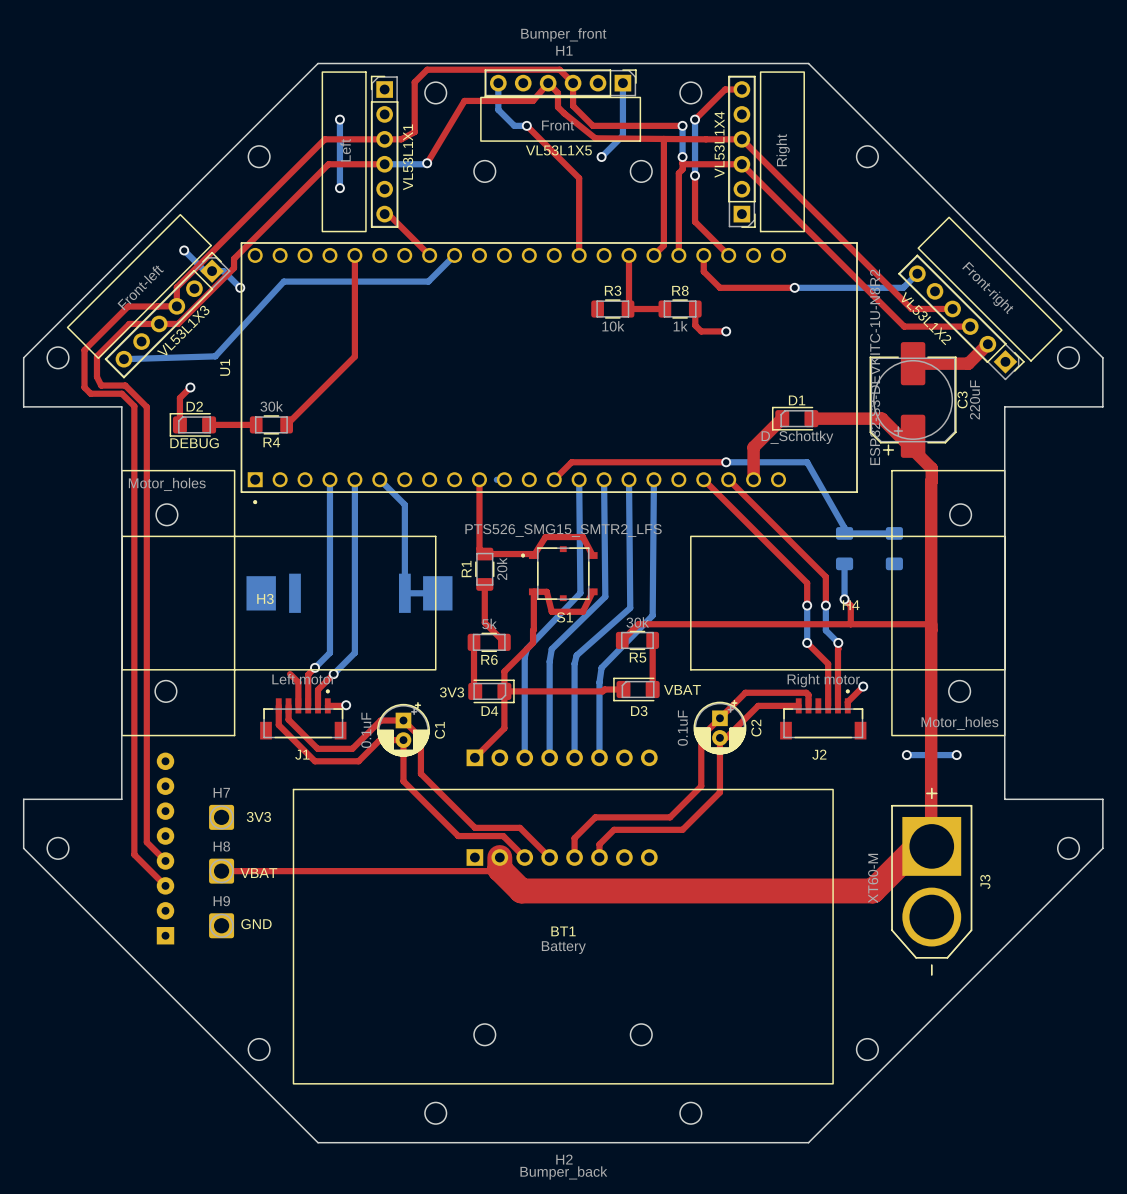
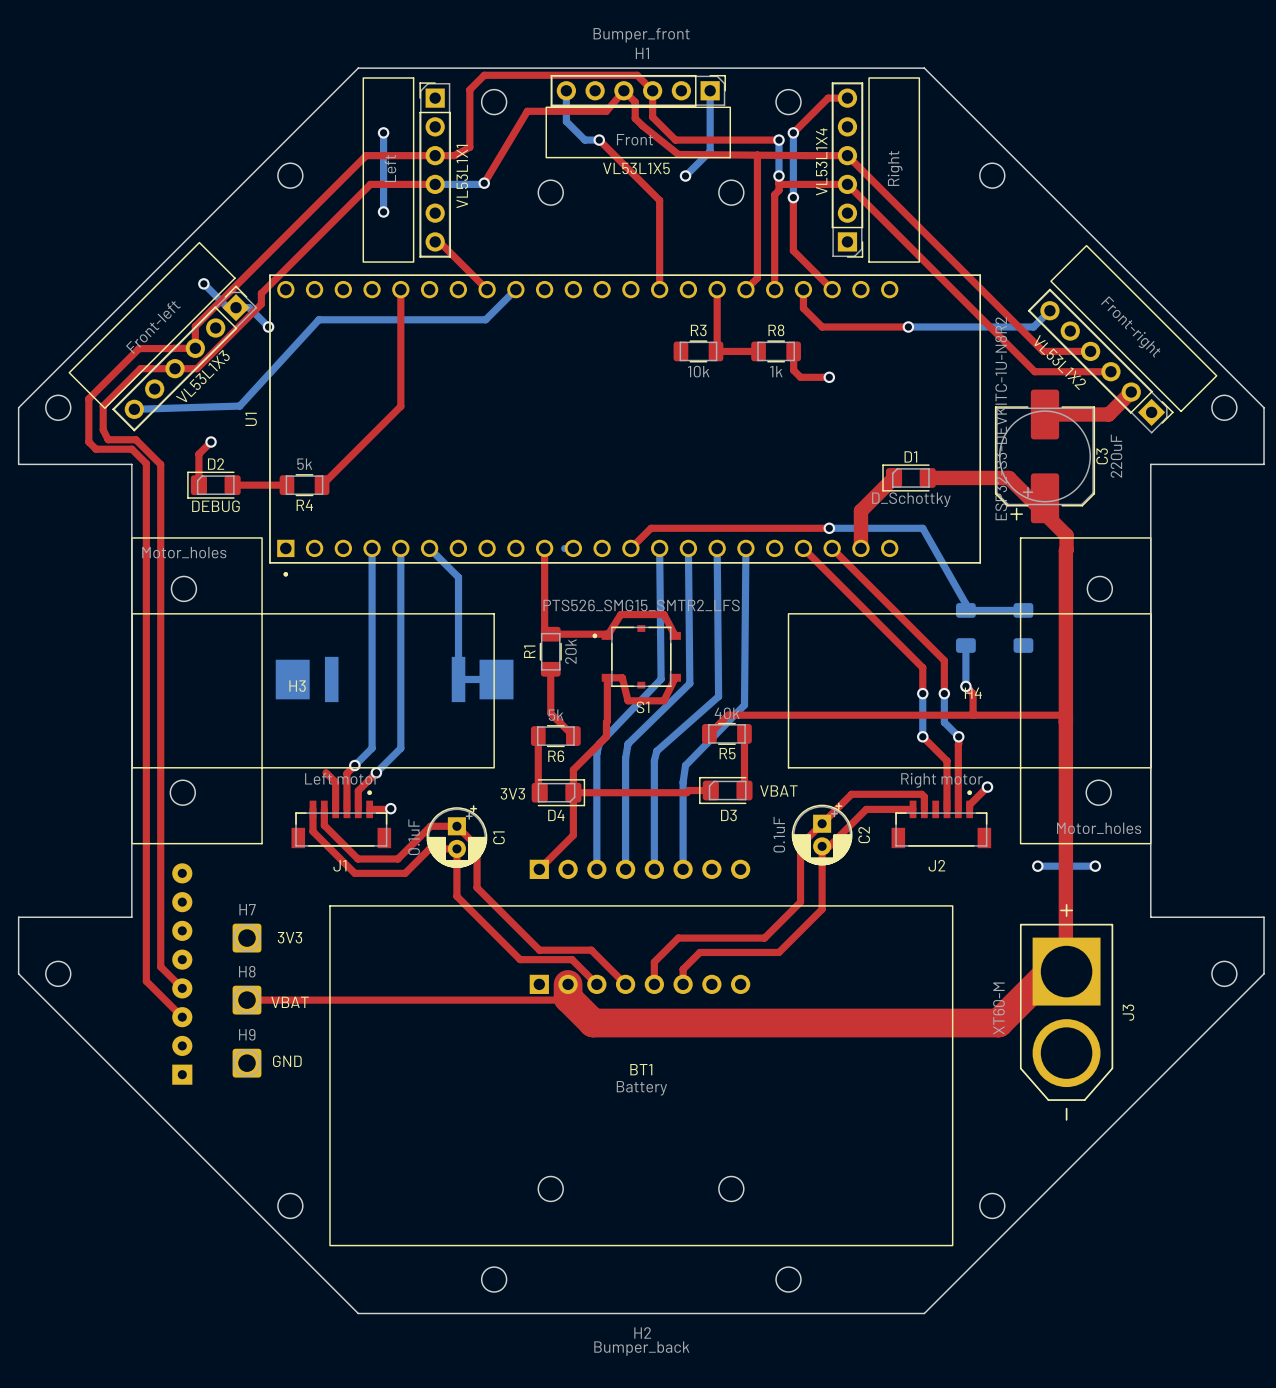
R4 value: 30k (271, 406) -> 5k (304, 464)
R5 value: 30k (637, 622) -> 40k (727, 713)

